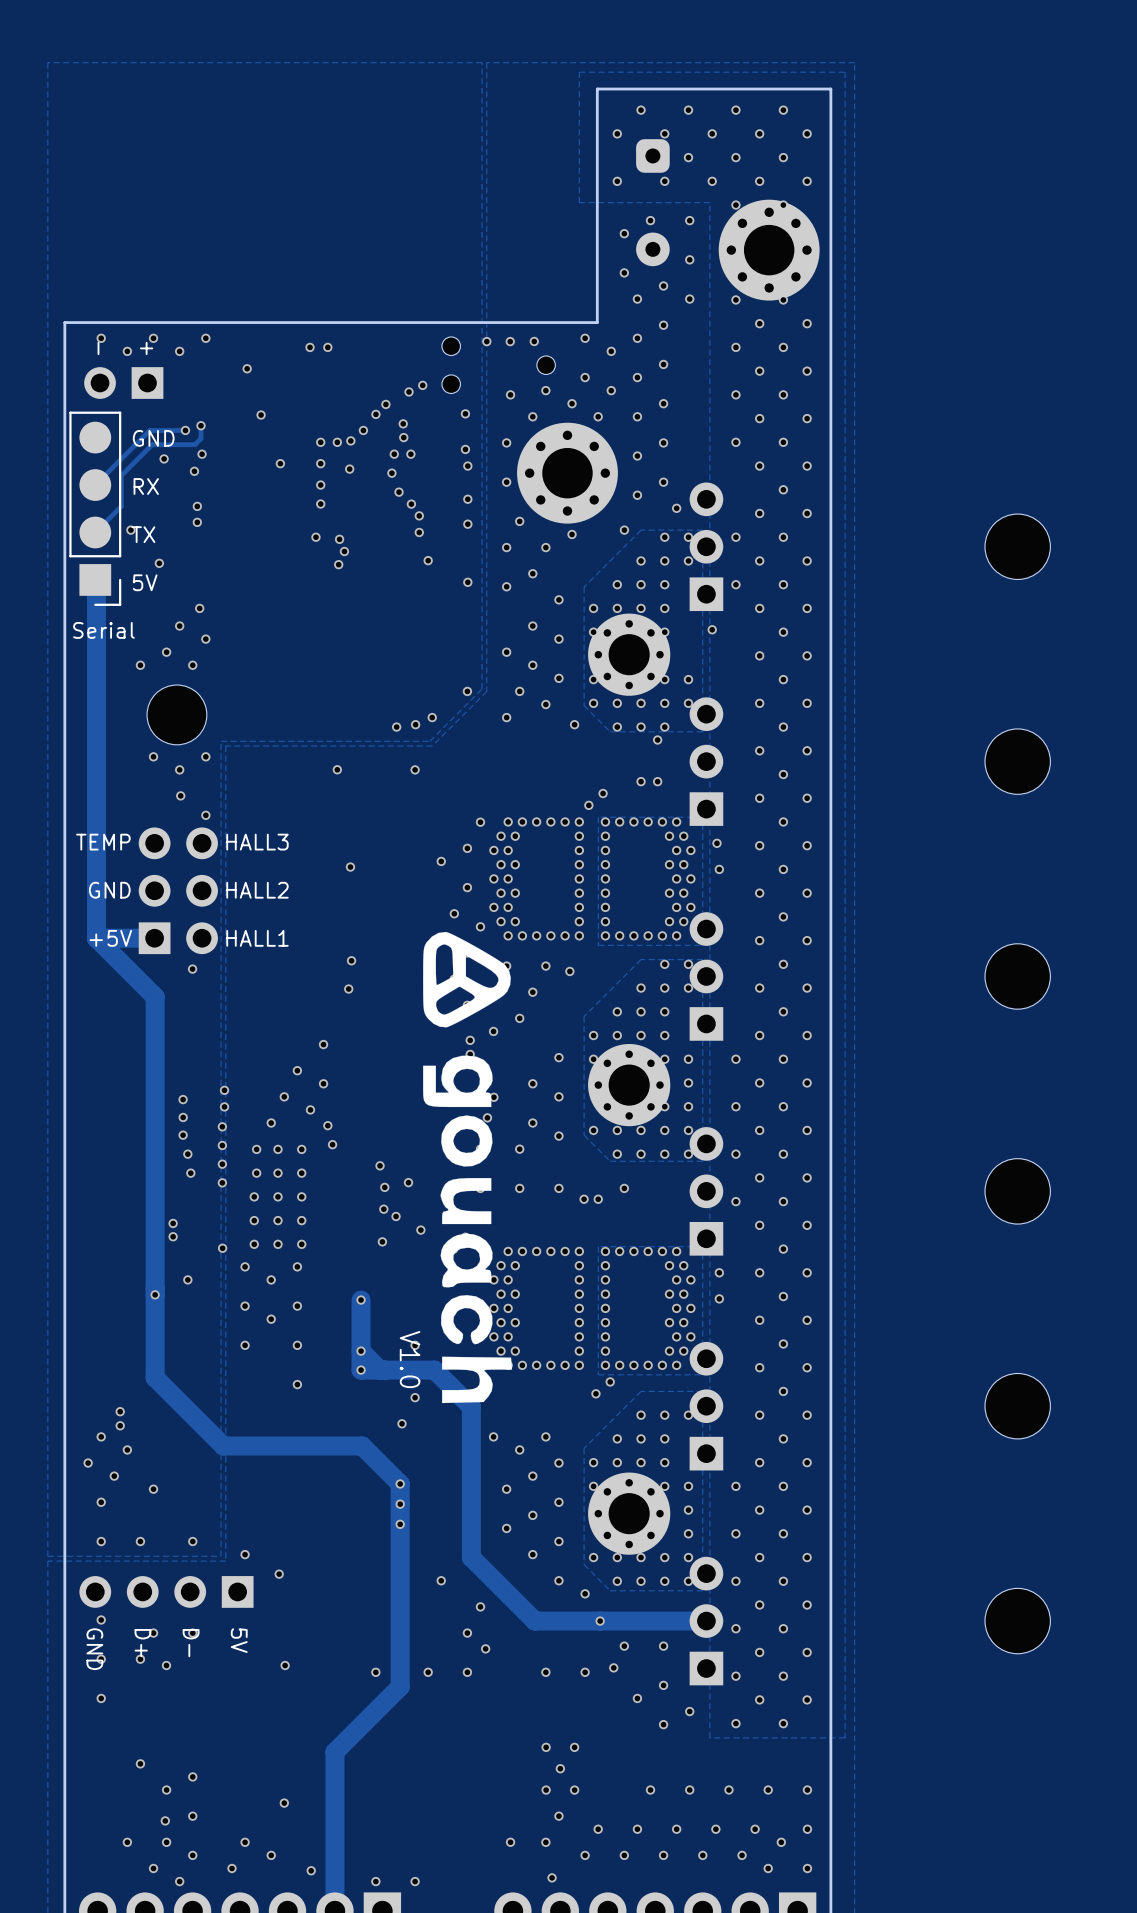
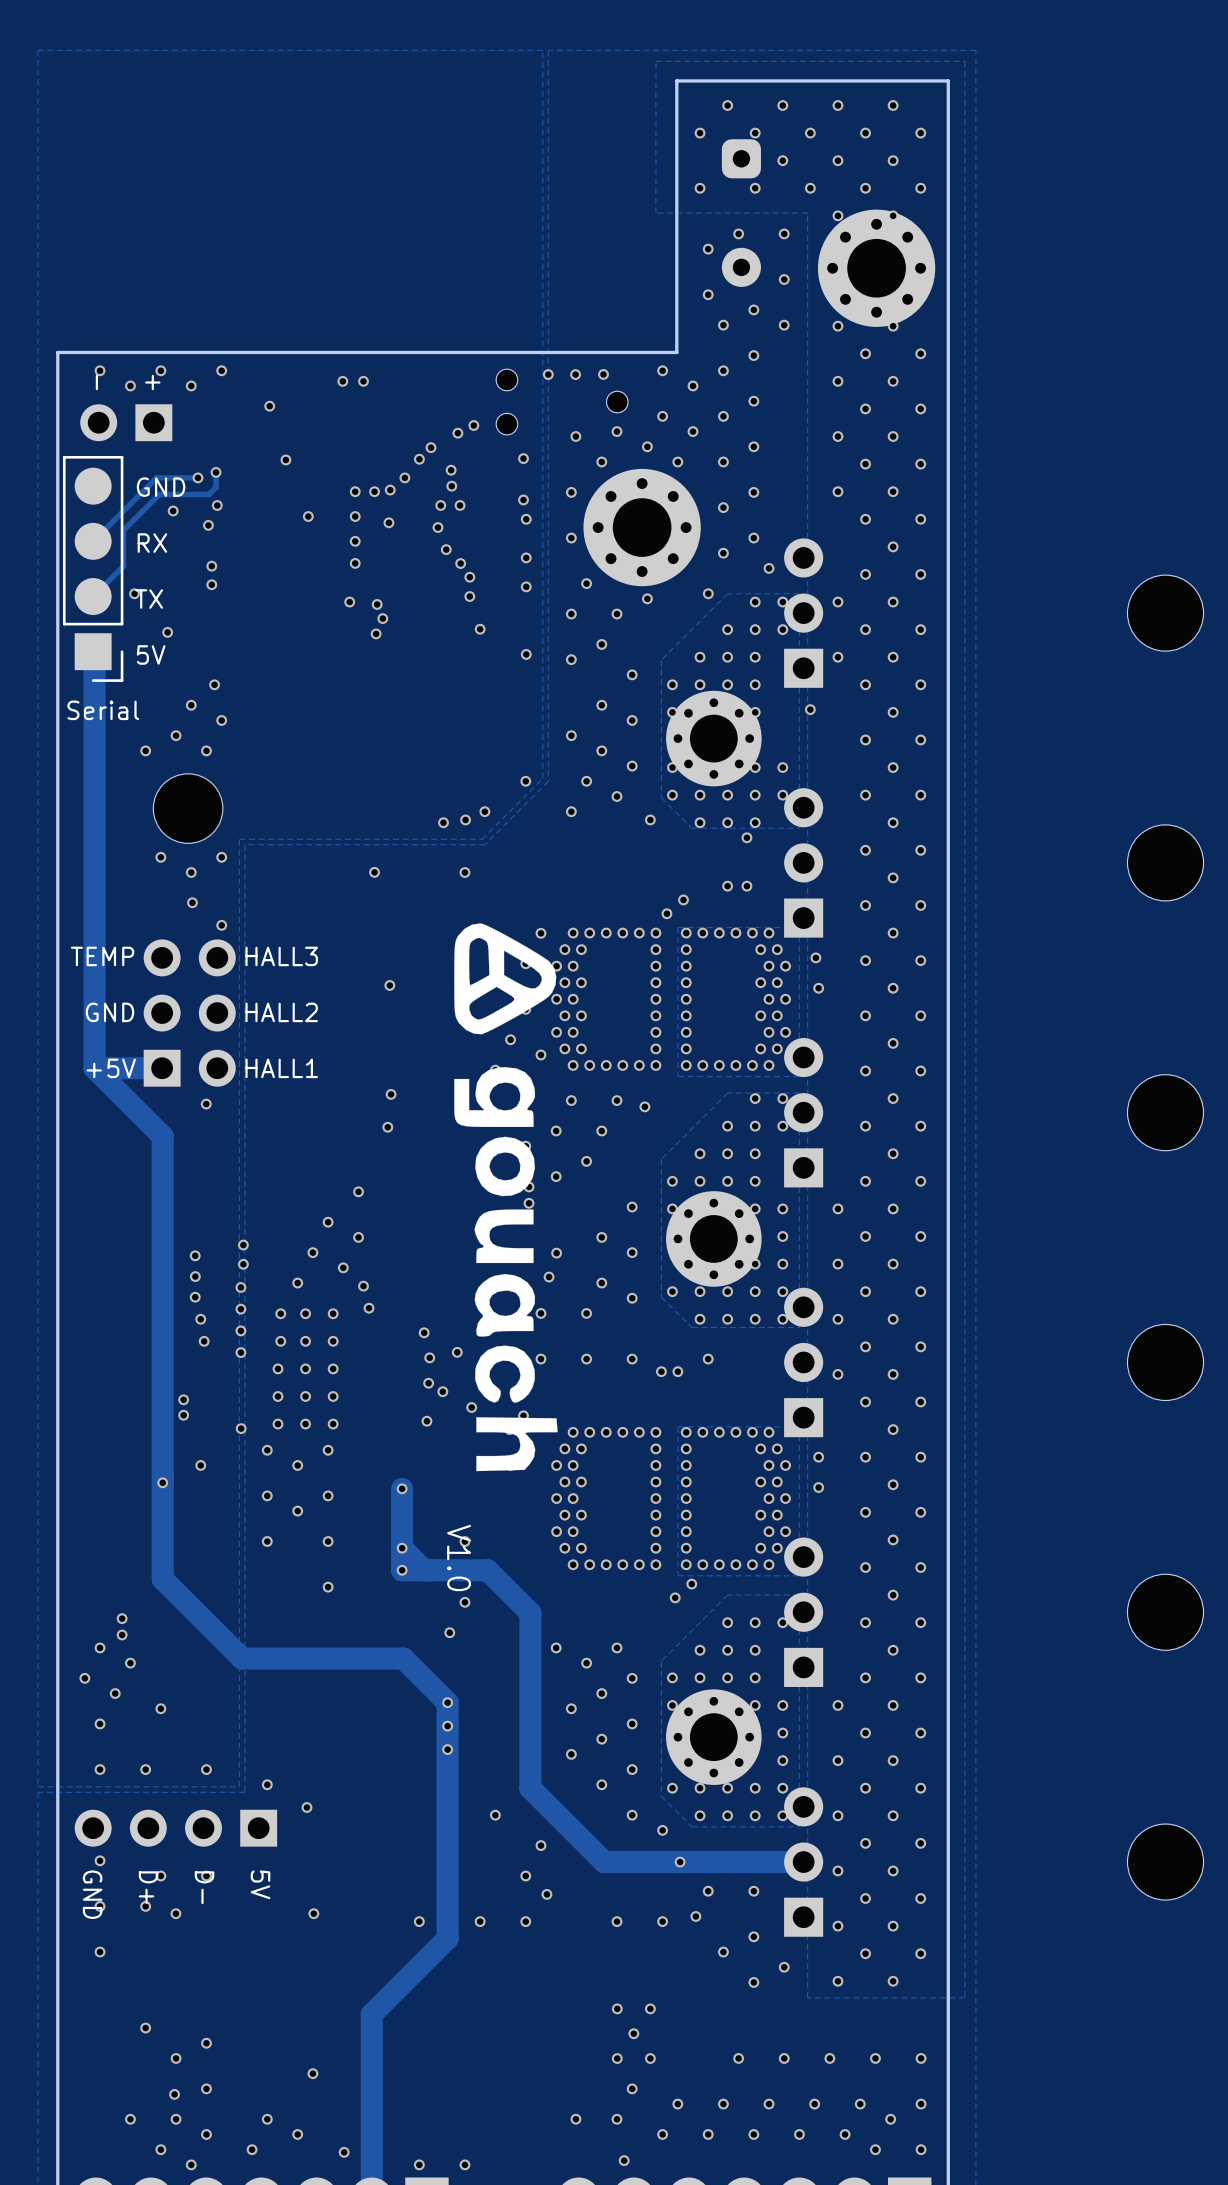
drawing position: (467, 1167) -> (505, 1197)

